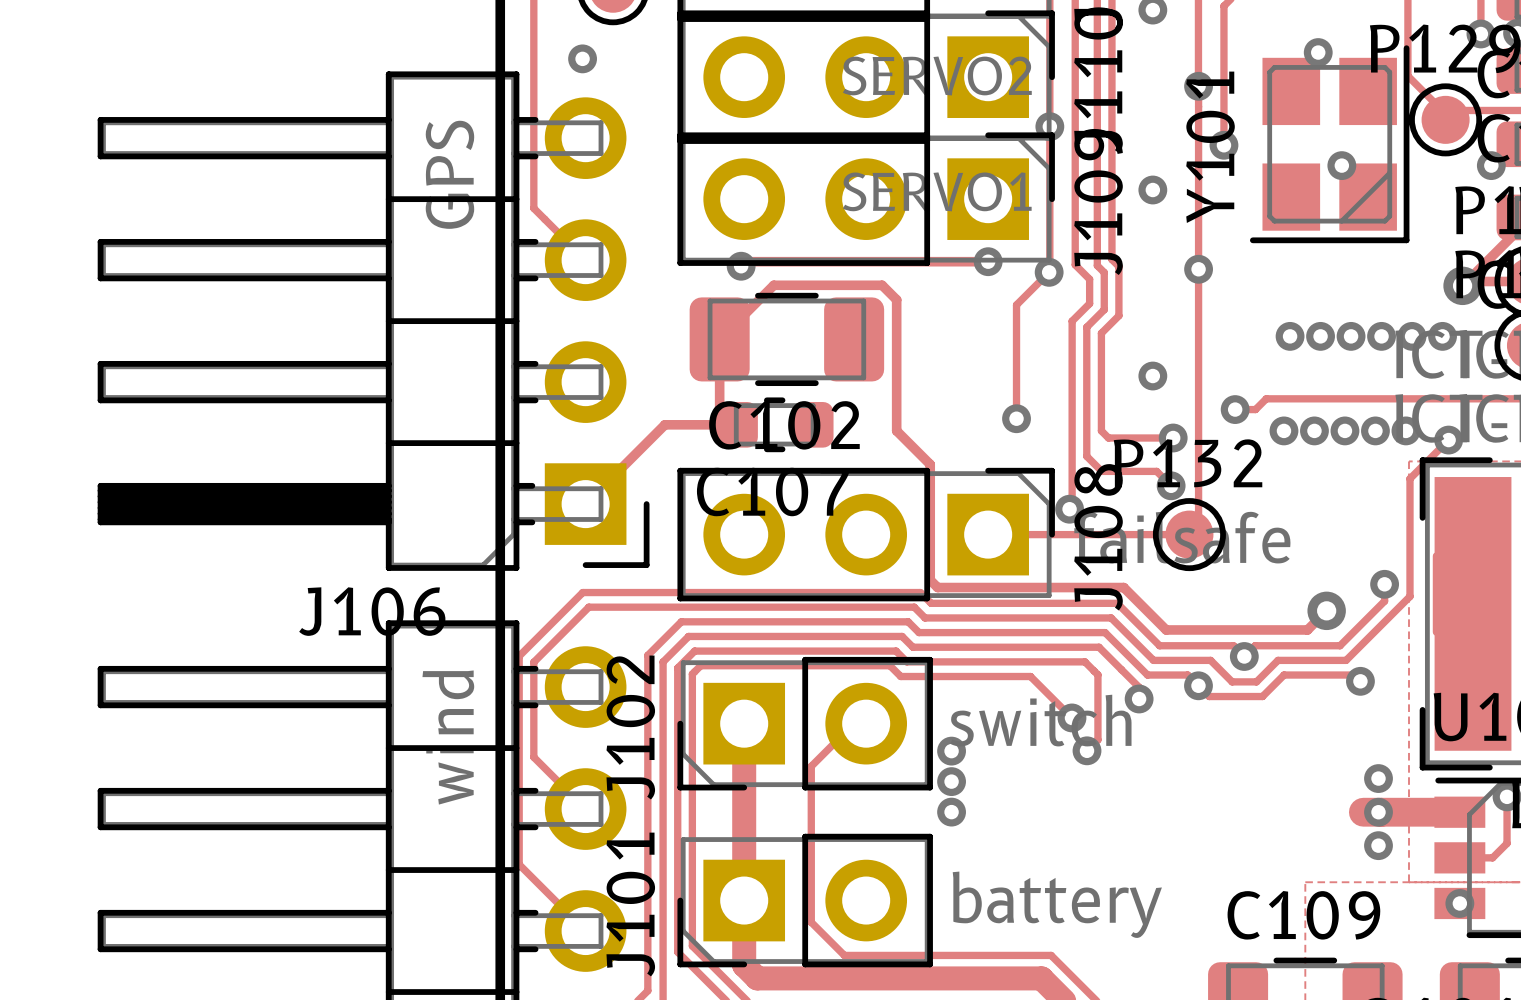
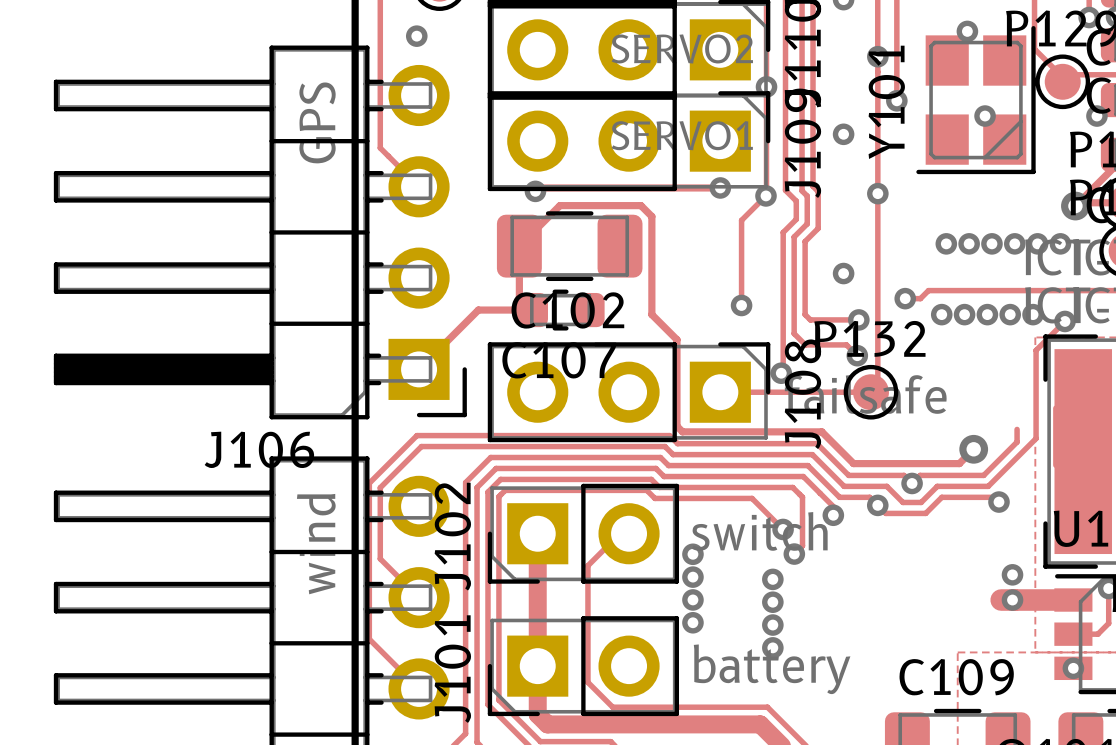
via: (1384, 584) -> none
via: none -> (772, 579)
via: none -> (772, 602)
via: none -> (692, 622)
via: none -> (772, 625)
via: (1378, 845) -> none
via: none -> (772, 647)

